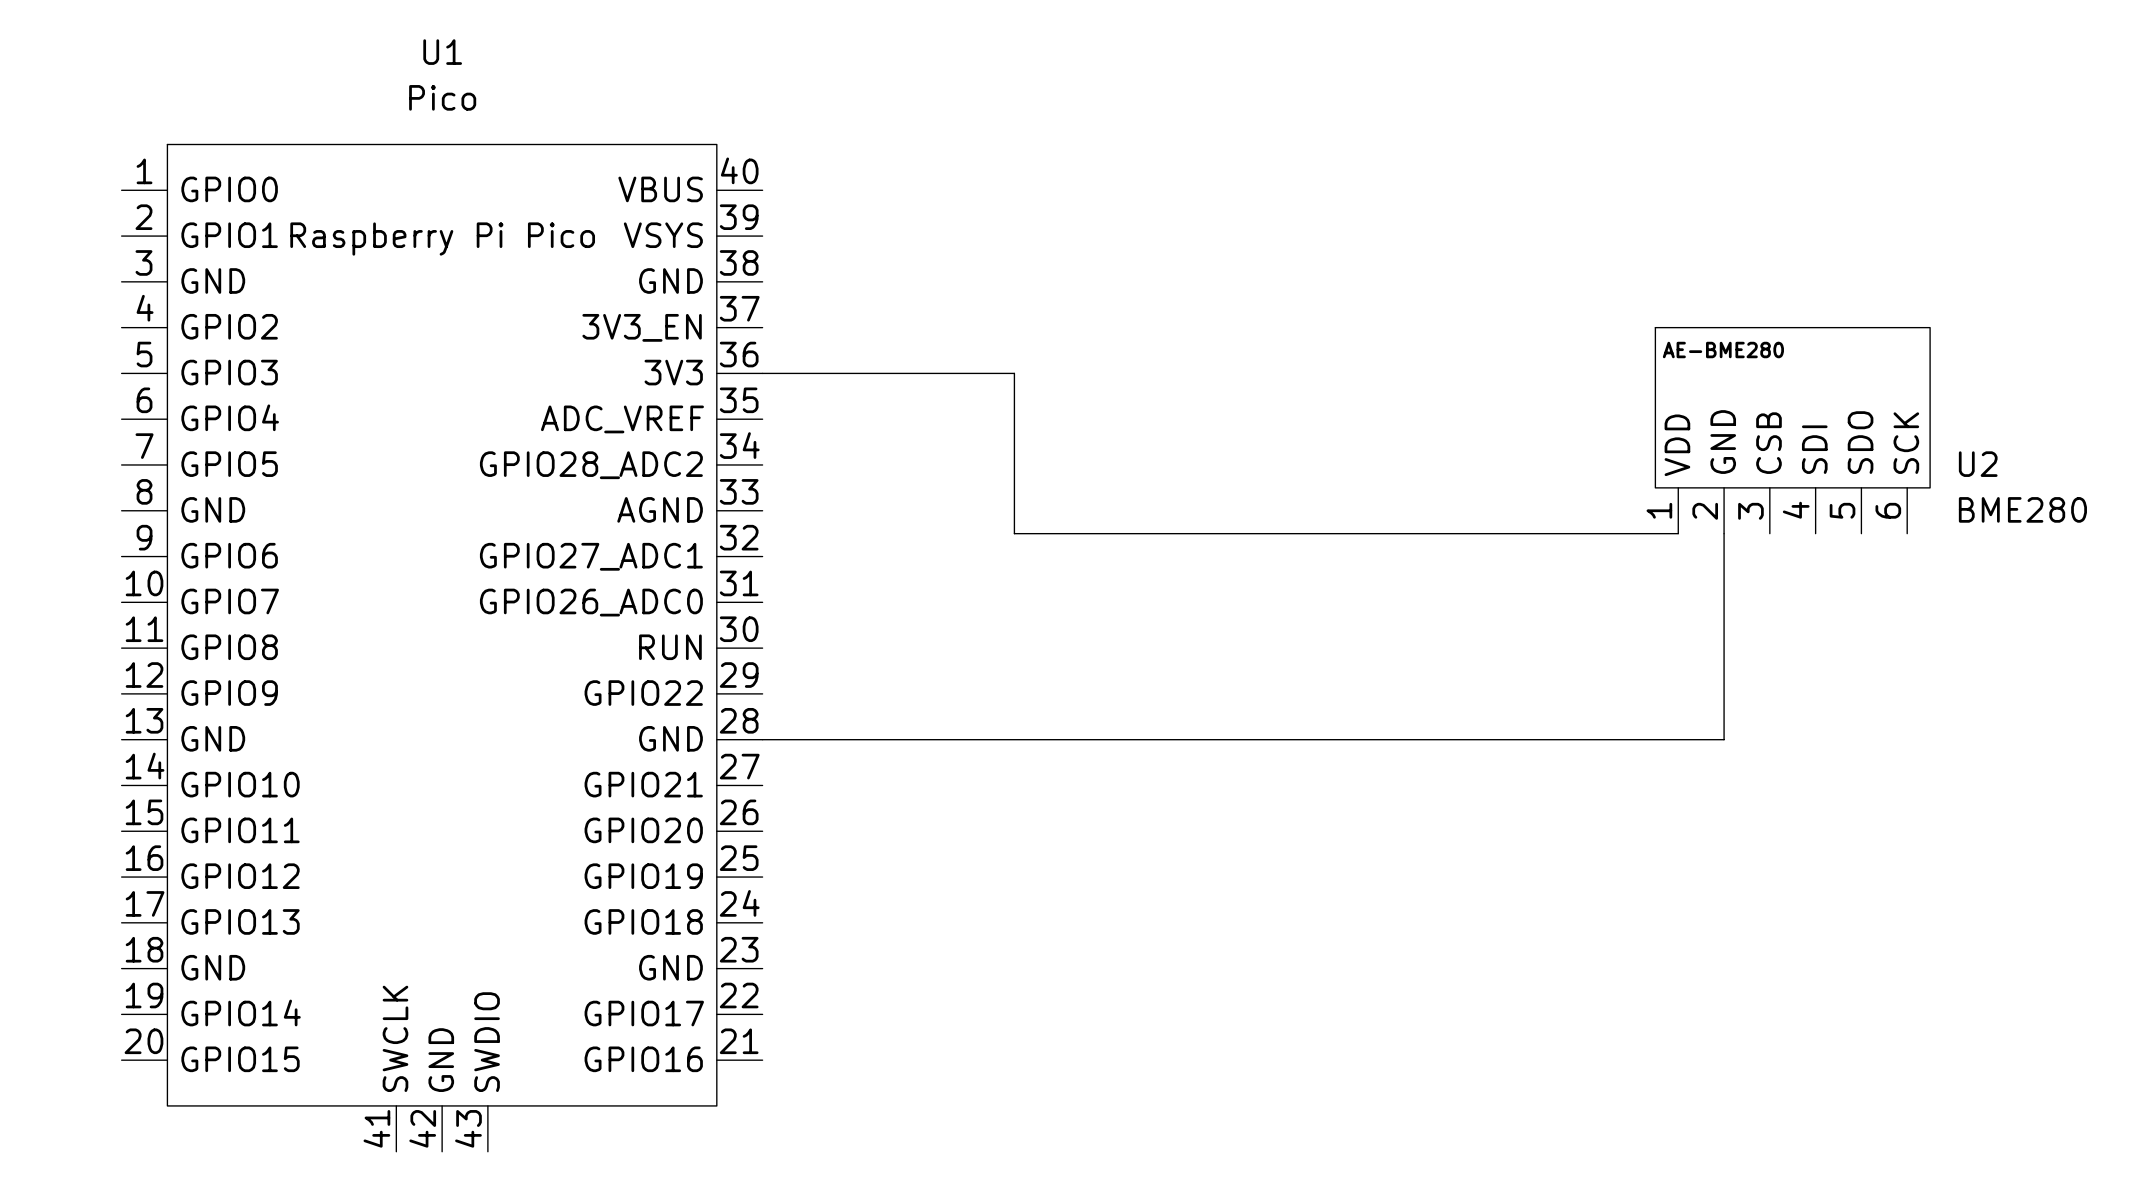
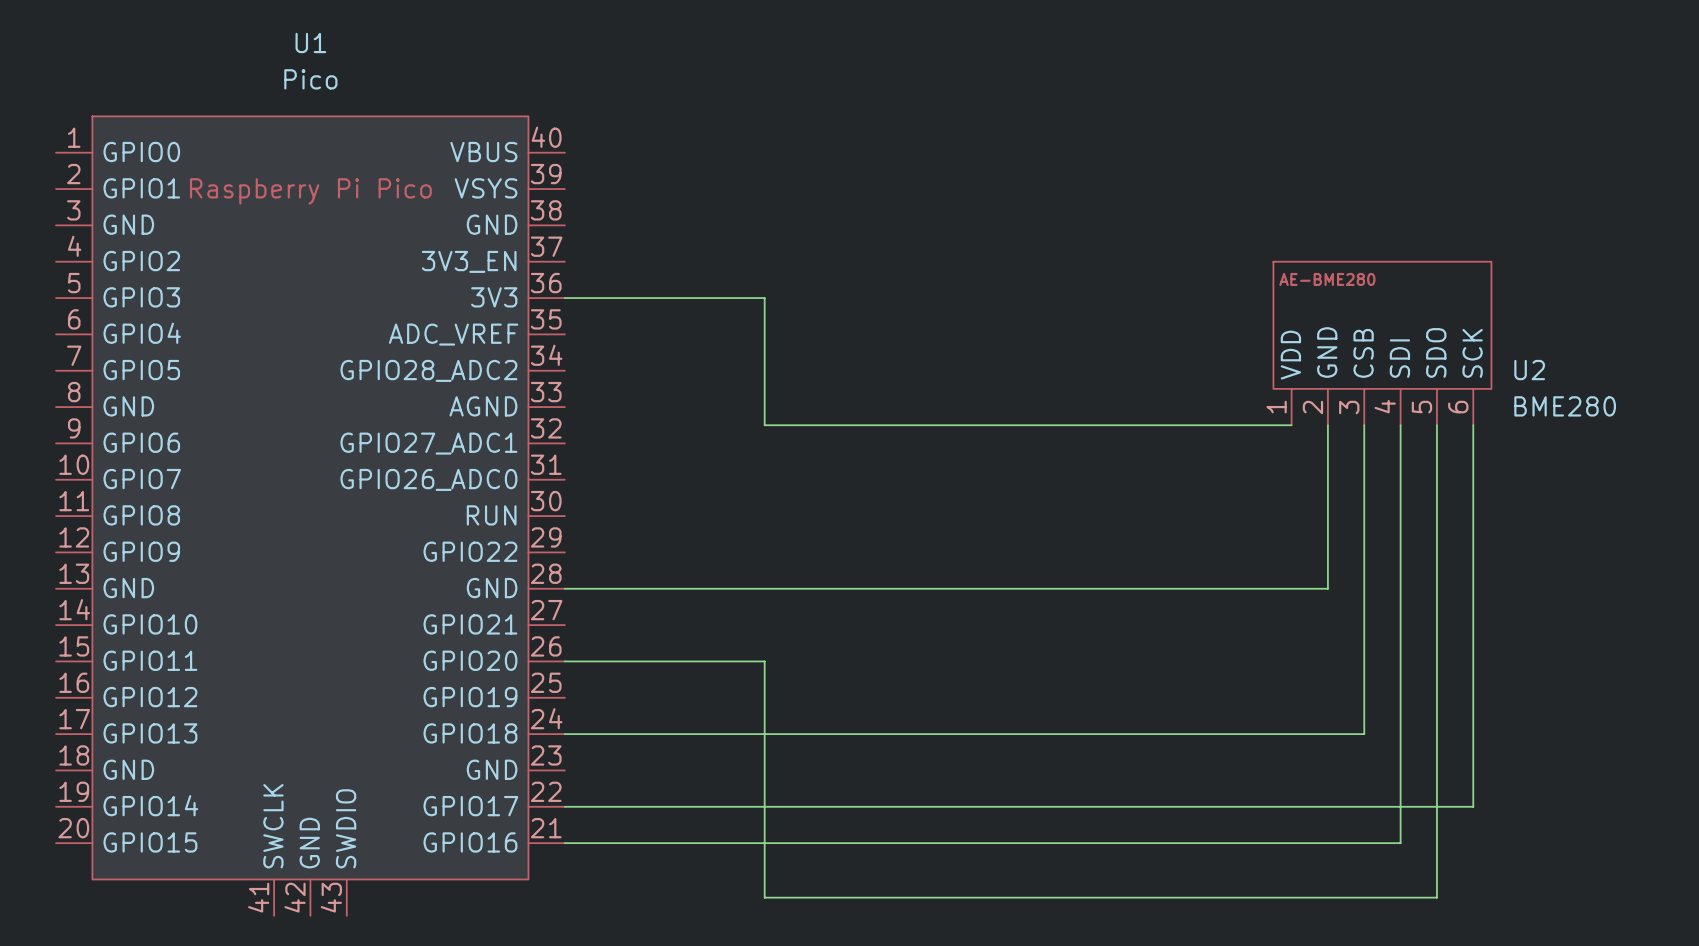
wire: none -> (1364, 425) (1364, 734) (564, 734)
wire: none -> (1400, 425) (1400, 843) (564, 843)
wire: none -> (1436, 425) (1436, 897) (764, 897) (764, 661) (564, 661)
wire: none -> (1473, 425) (1473, 806) (564, 806)

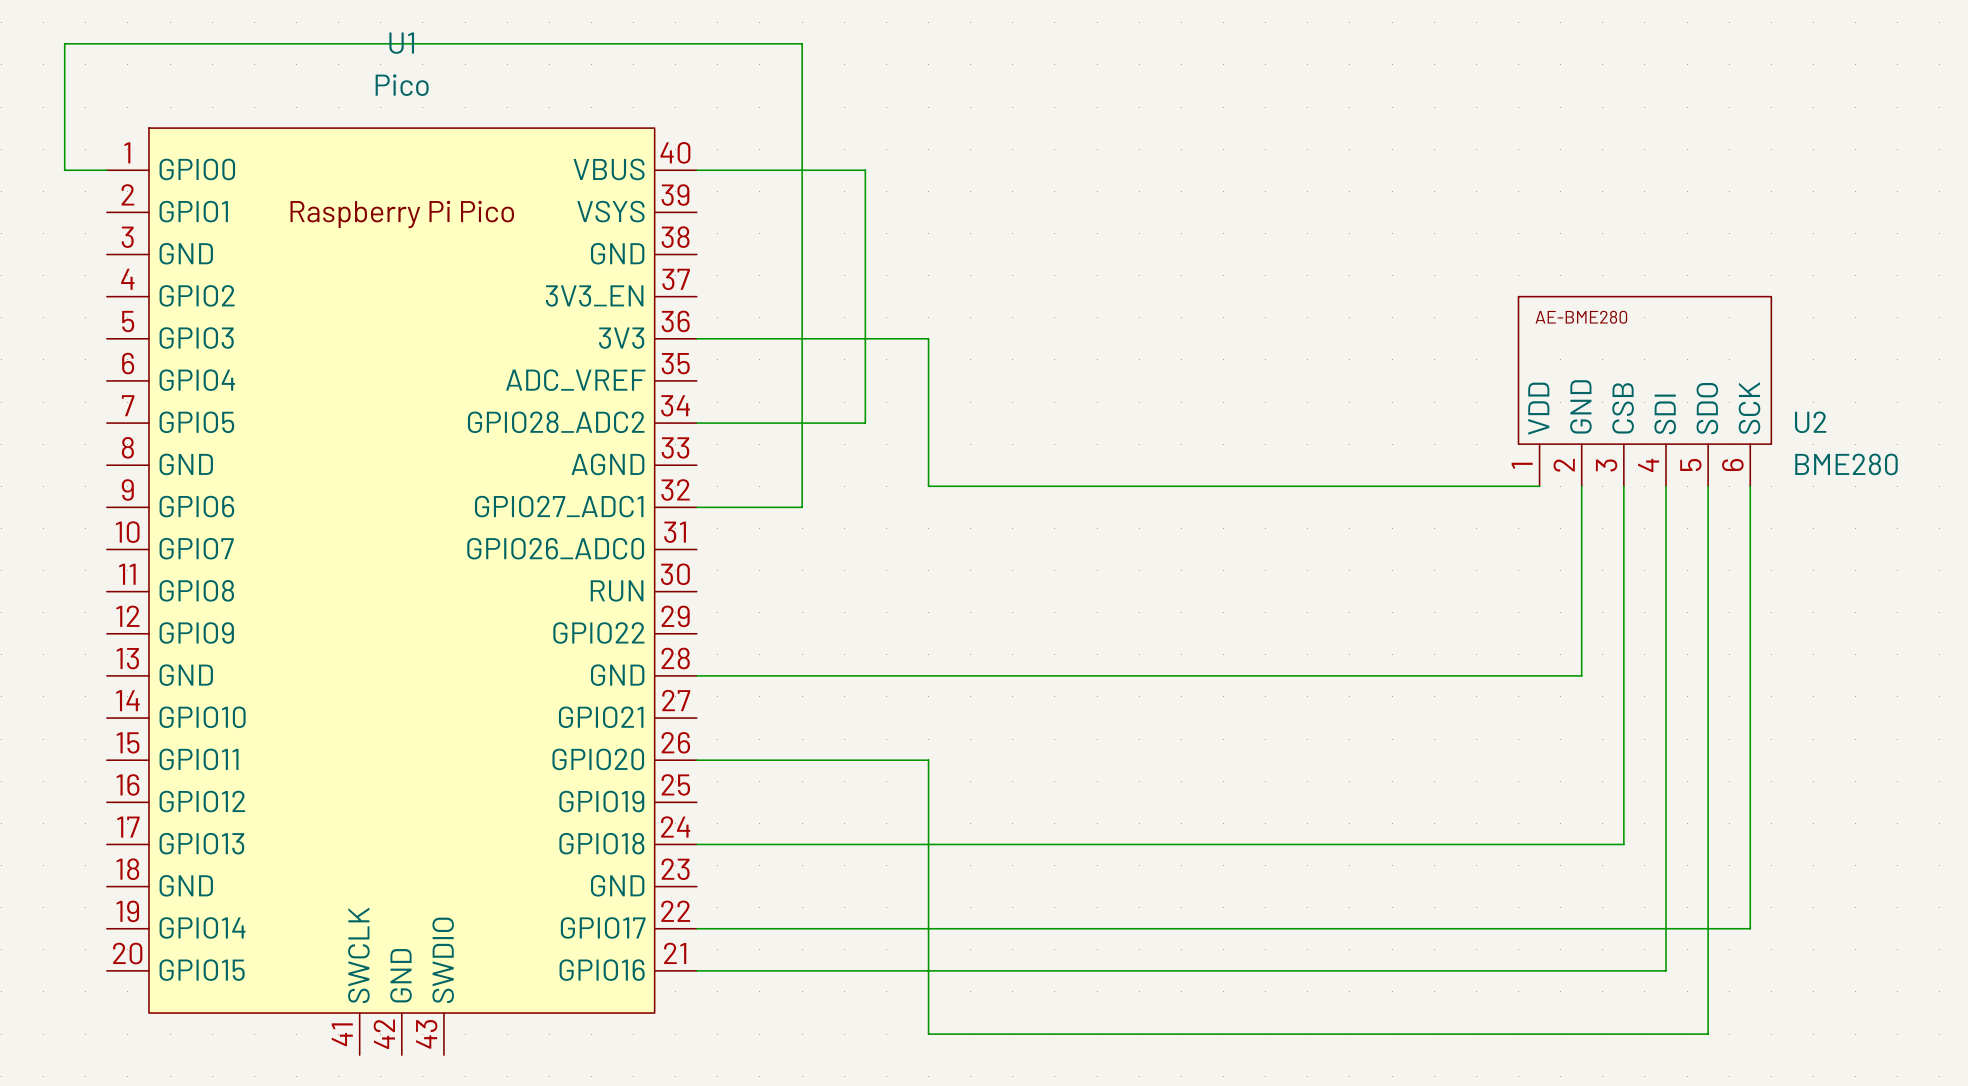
wire: none -> (106, 170) (64, 170) (64, 43) (802, 43) (802, 507) (696, 507)
wire: none -> (696, 170) (865, 170) (865, 423) (696, 423)

